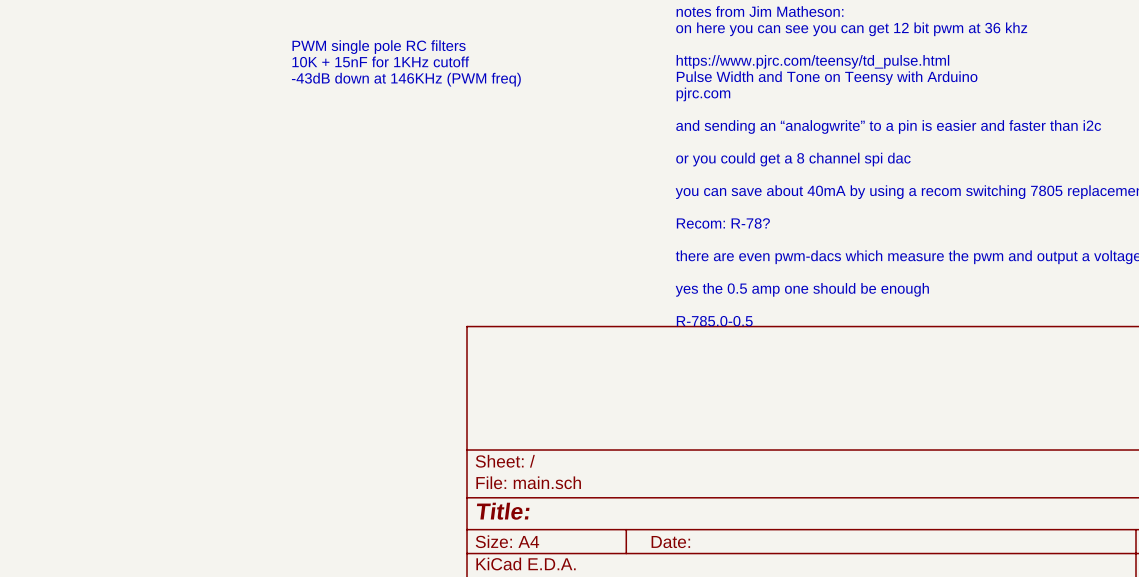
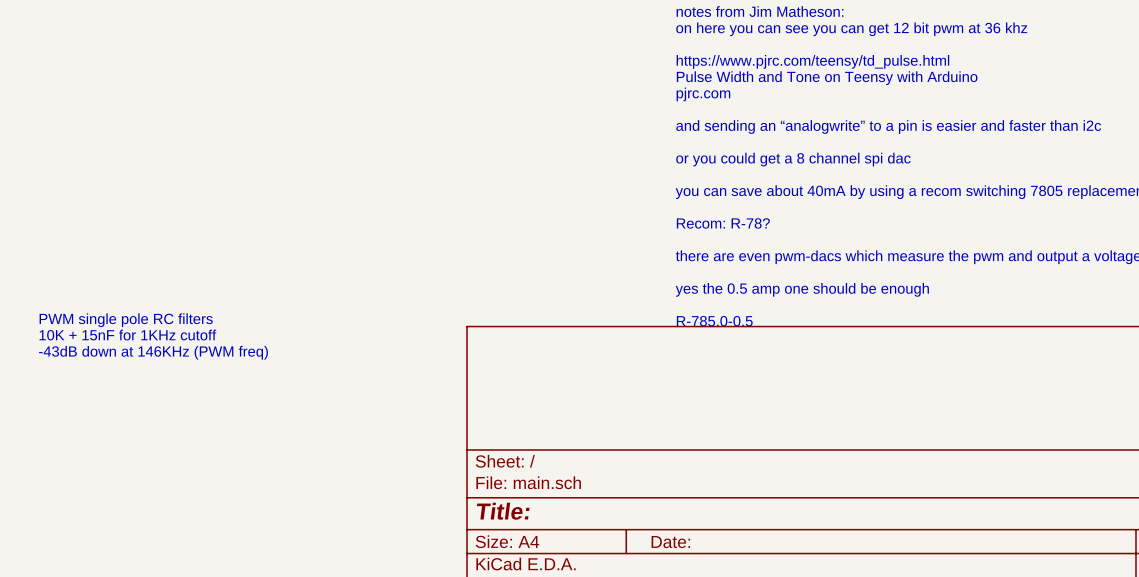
text: PWM single pole RC filters (379, 47) -> none
text: 10K + 15nF for 1KHz cutoff (380, 61) -> none
text: -43dB down at 146KHz (PWM freq) (406, 79) -> none
text: none -> PWM single pole RC filters (126, 320)
text: none -> 10K + 15nF for 1KHz cutoff (127, 335)
text: none -> -43dB down at 146KHz (PWM freq) (153, 352)

